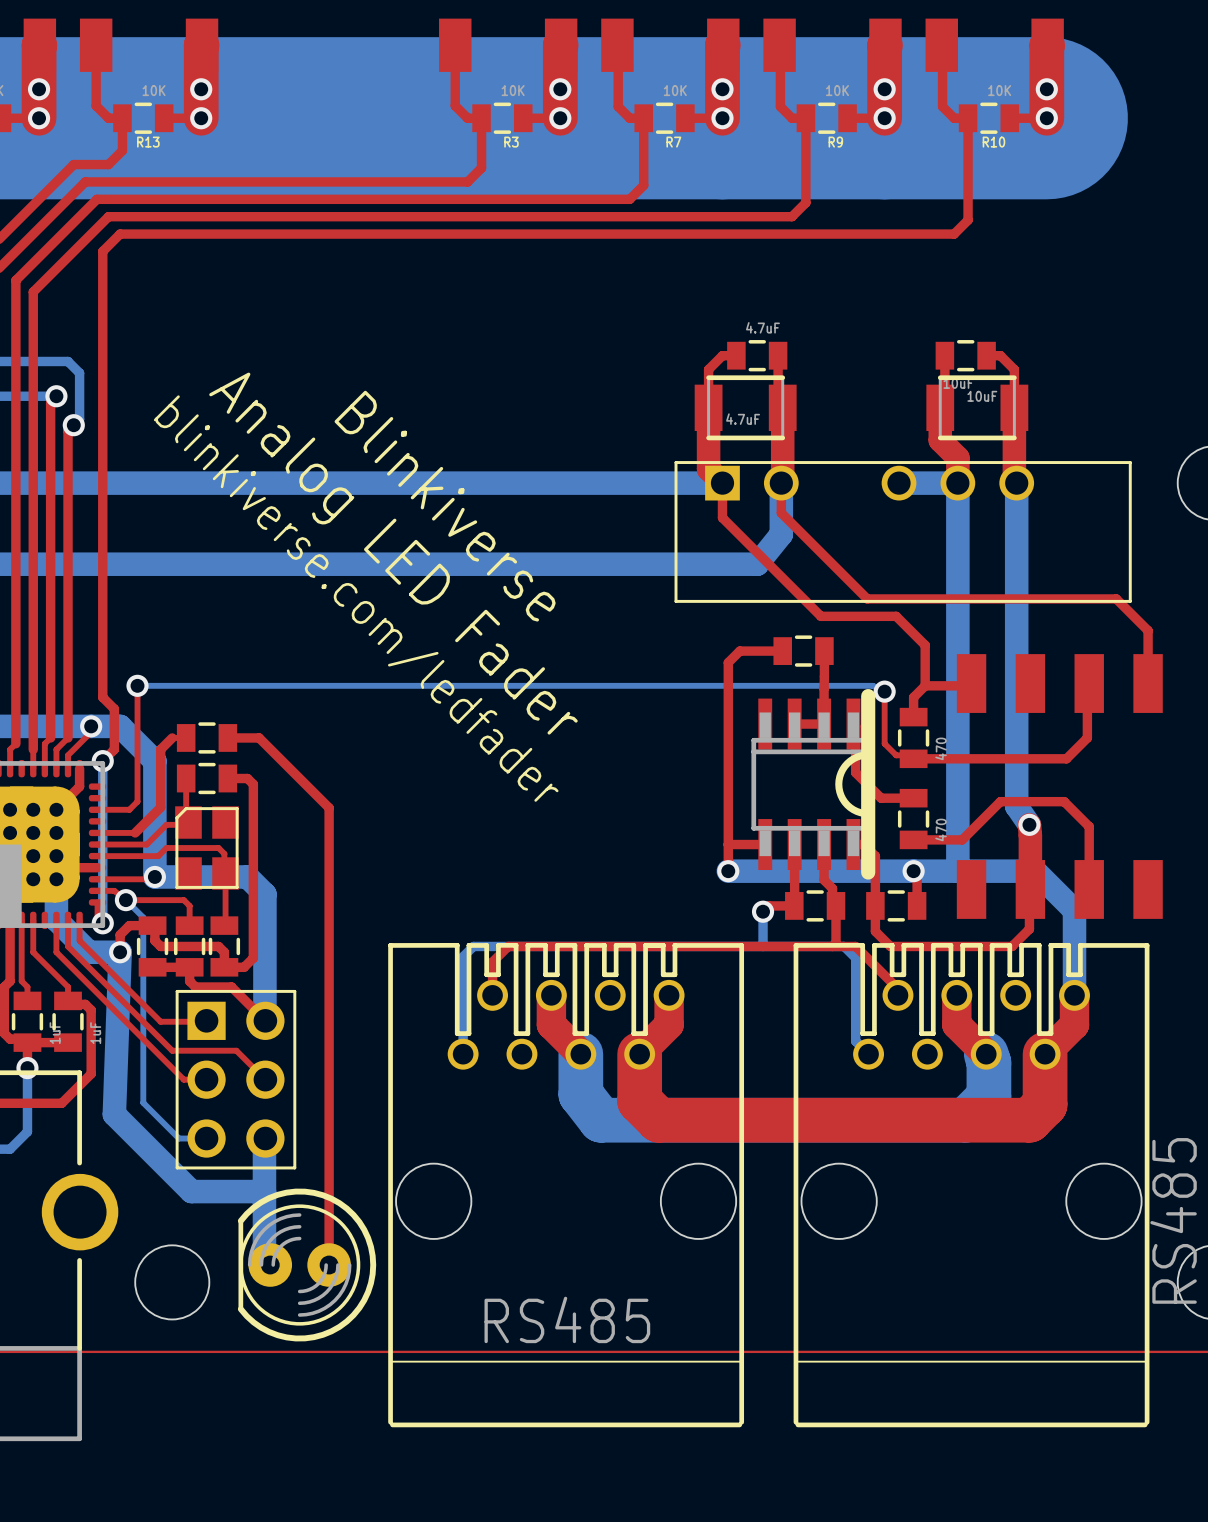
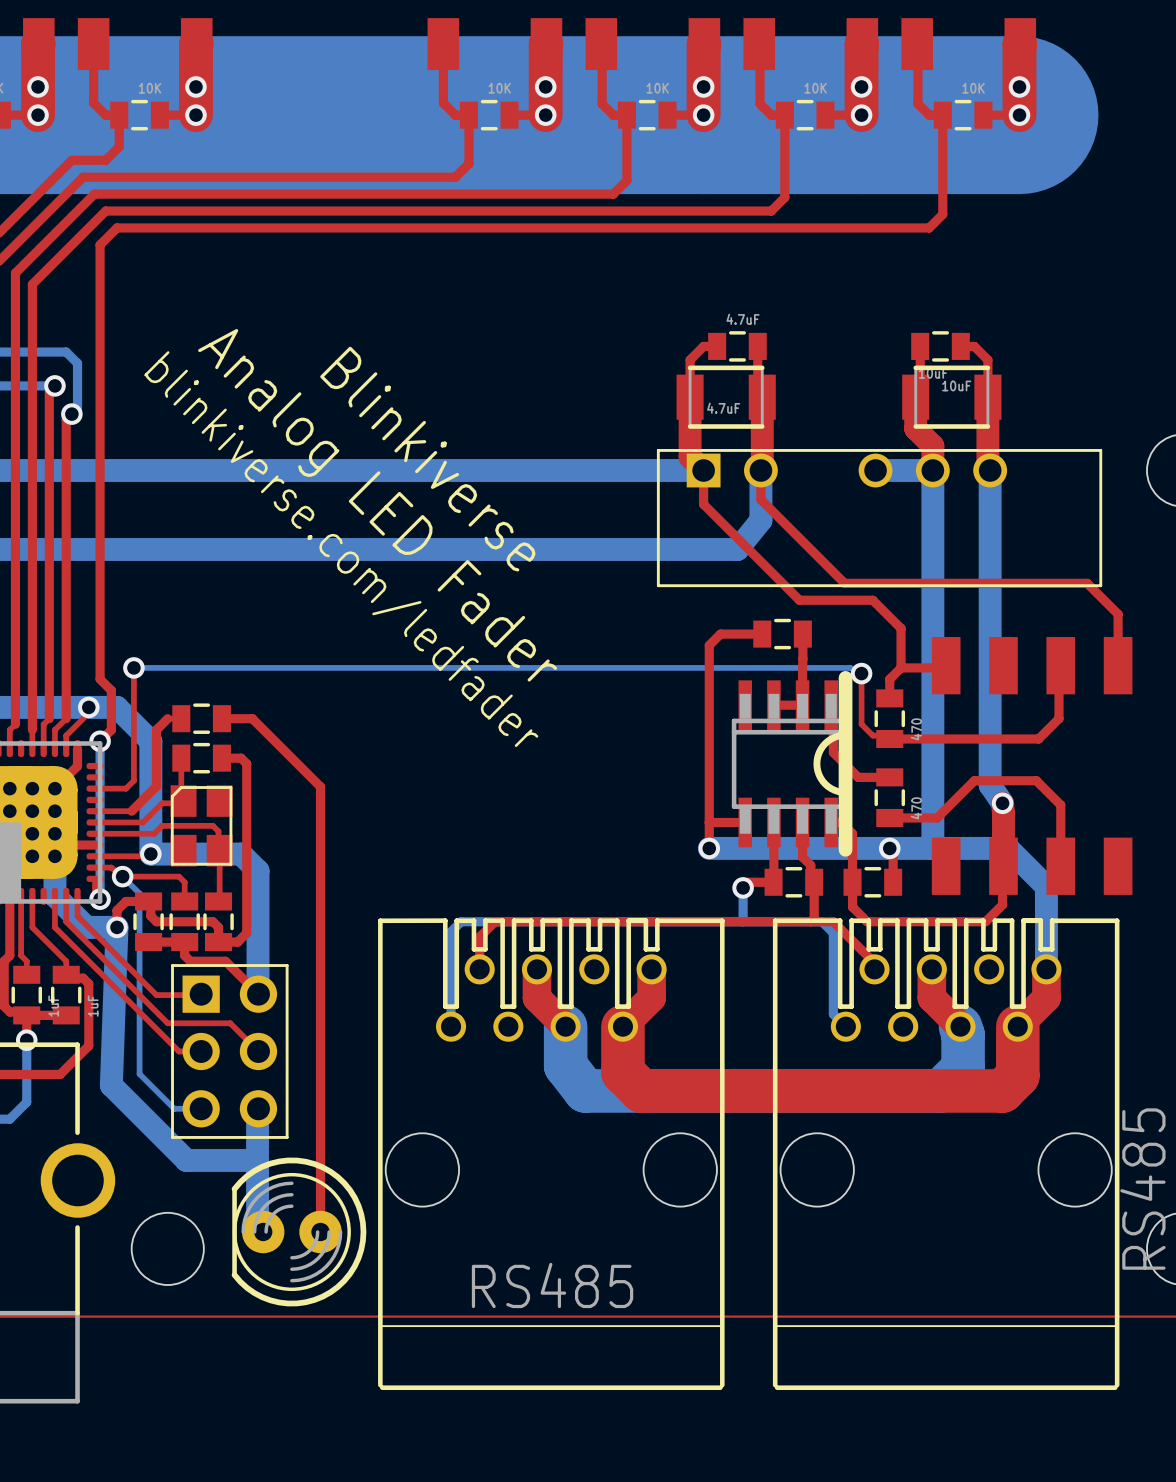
R13 name: R13 (148, 142) -> none
R3 name: R3 (511, 142) -> none
R7 name: R7 (673, 142) -> none
R9 name: R9 (835, 142) -> none
R10 name: R10 (993, 142) -> none
text position: Blinkiverse (445, 506) -> Blinkiverse (427, 459)
text position: Analog LED Fader (393, 553) -> Analog LED Fader (377, 505)
text position: blinkiverse.com/ledfader (356, 598) -> blinkiverse.com/ledfader (341, 549)

